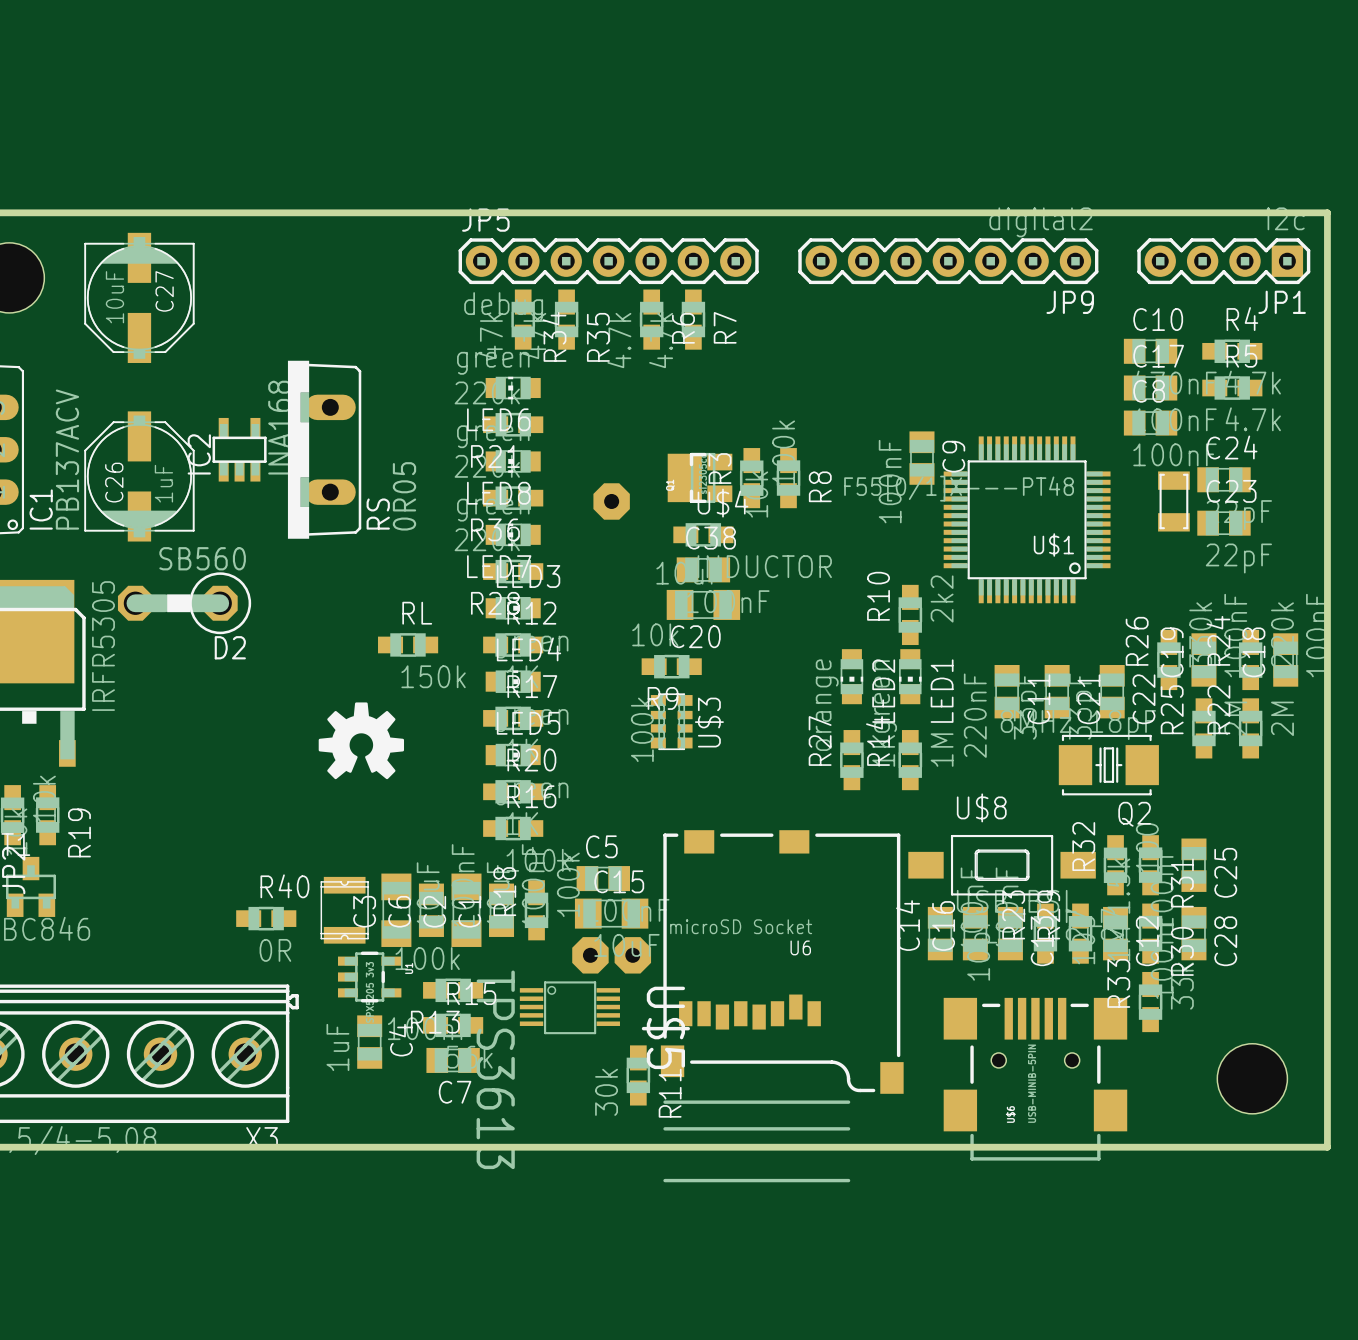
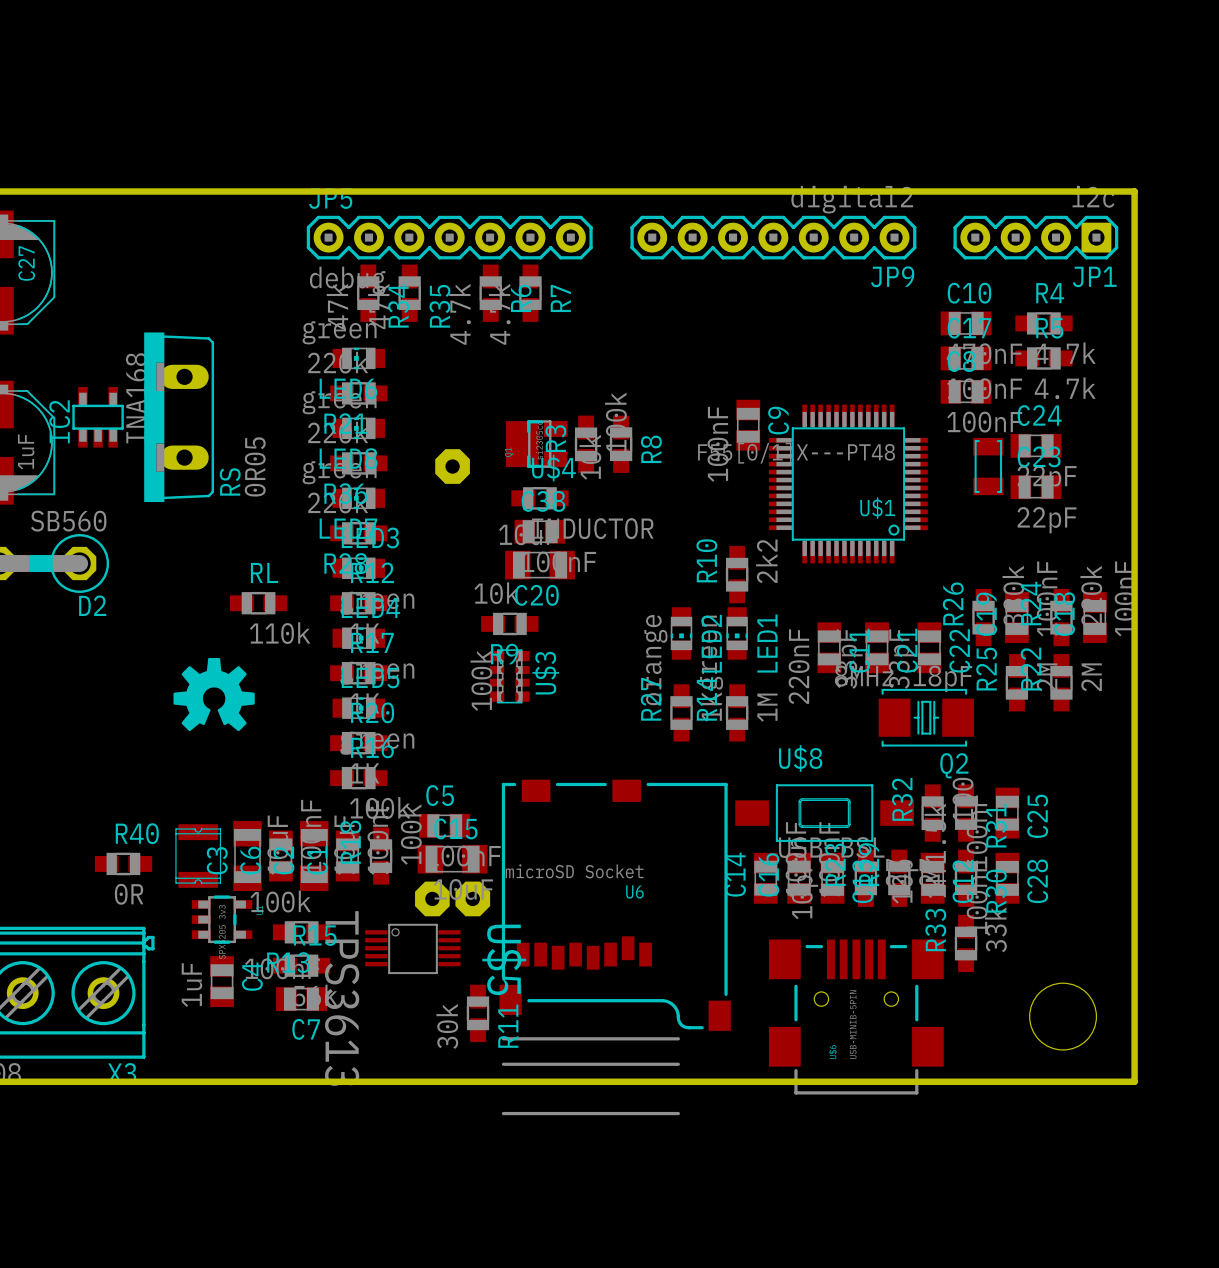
RL value: 150k (433, 676) -> 110k (280, 633)

